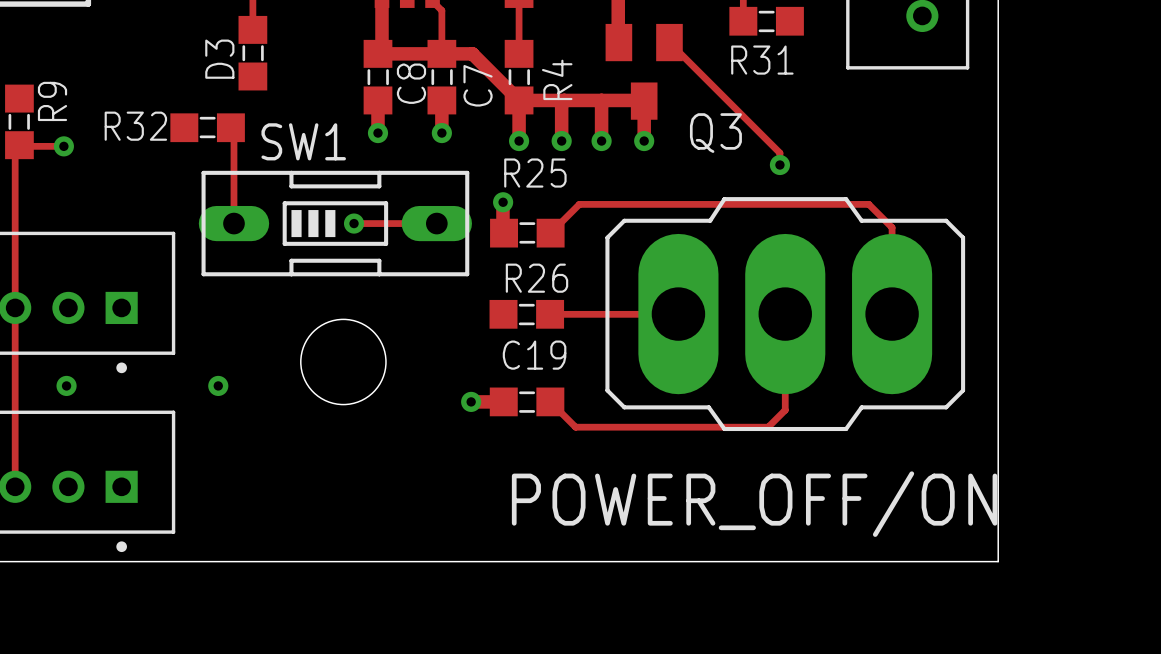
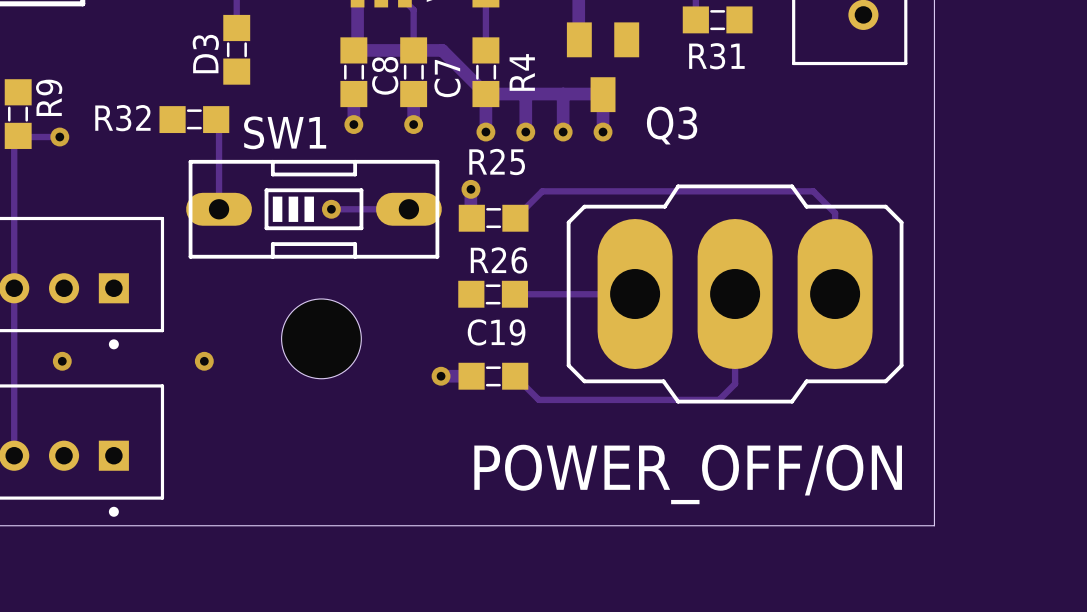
track: (669, 42) (779, 153) (779, 165) -> none
via: (779, 165) -> none

